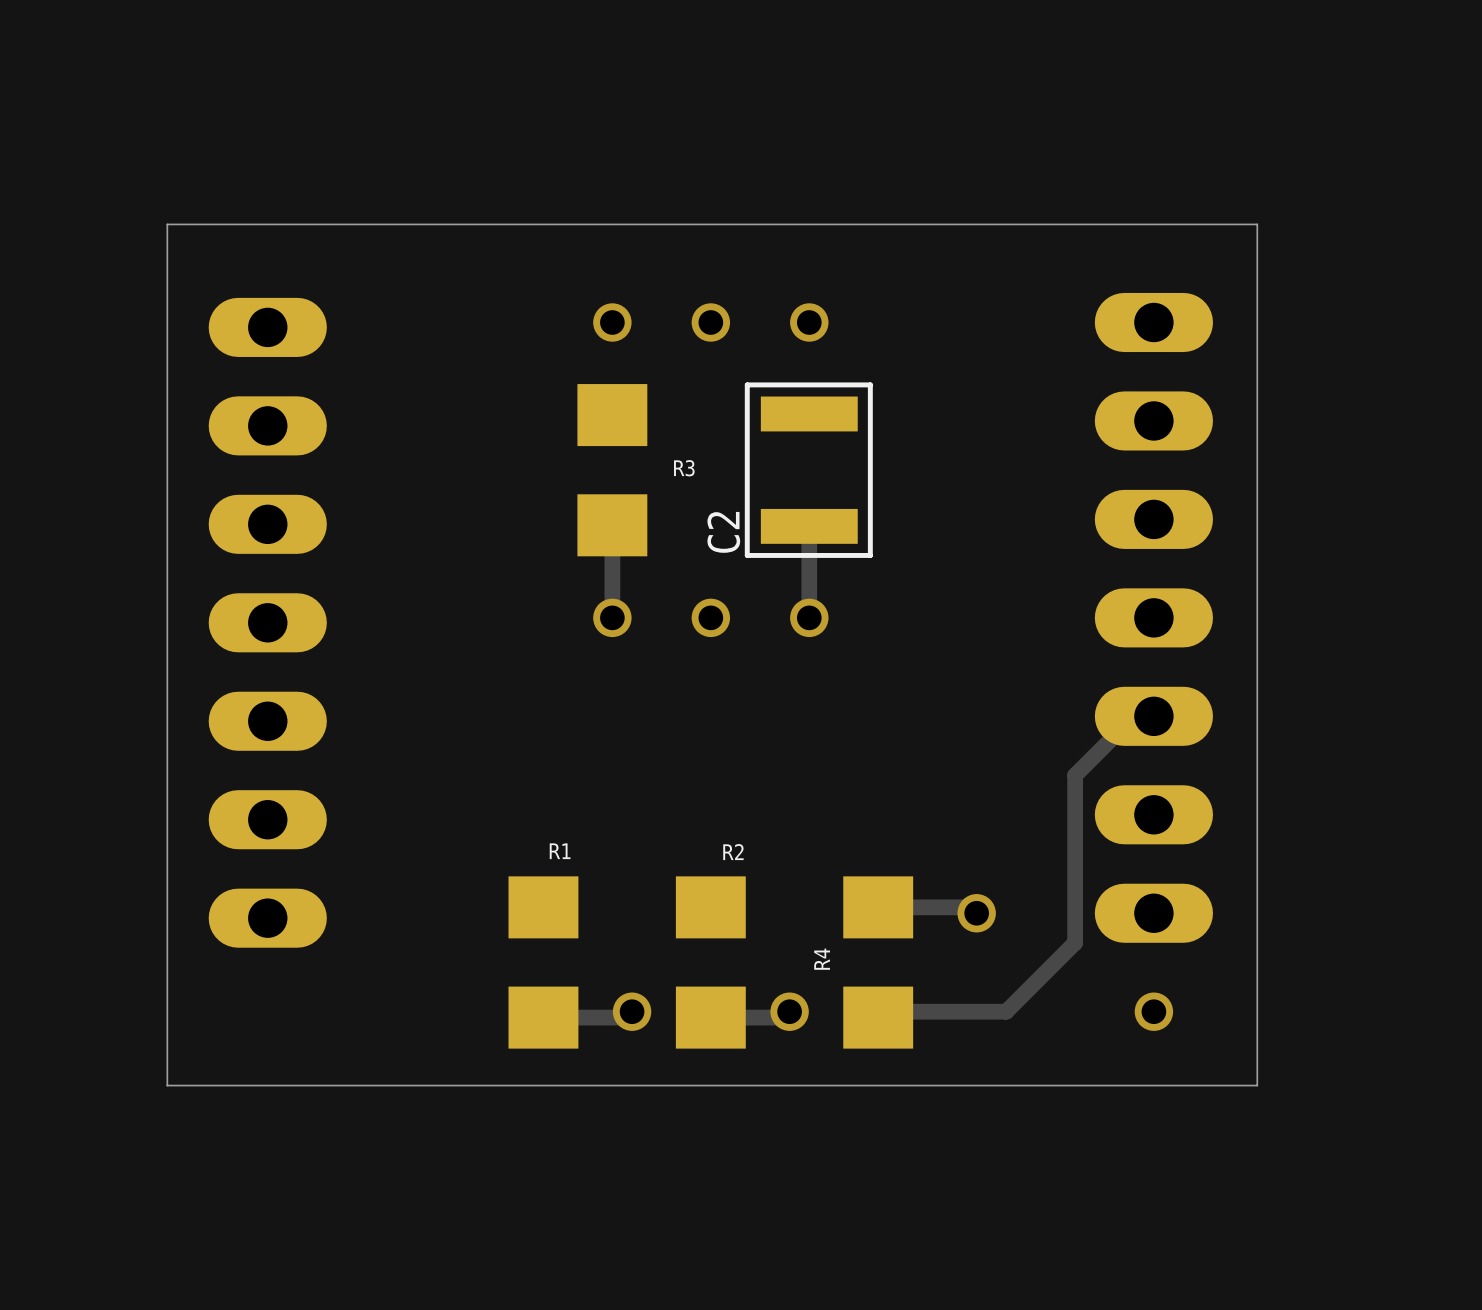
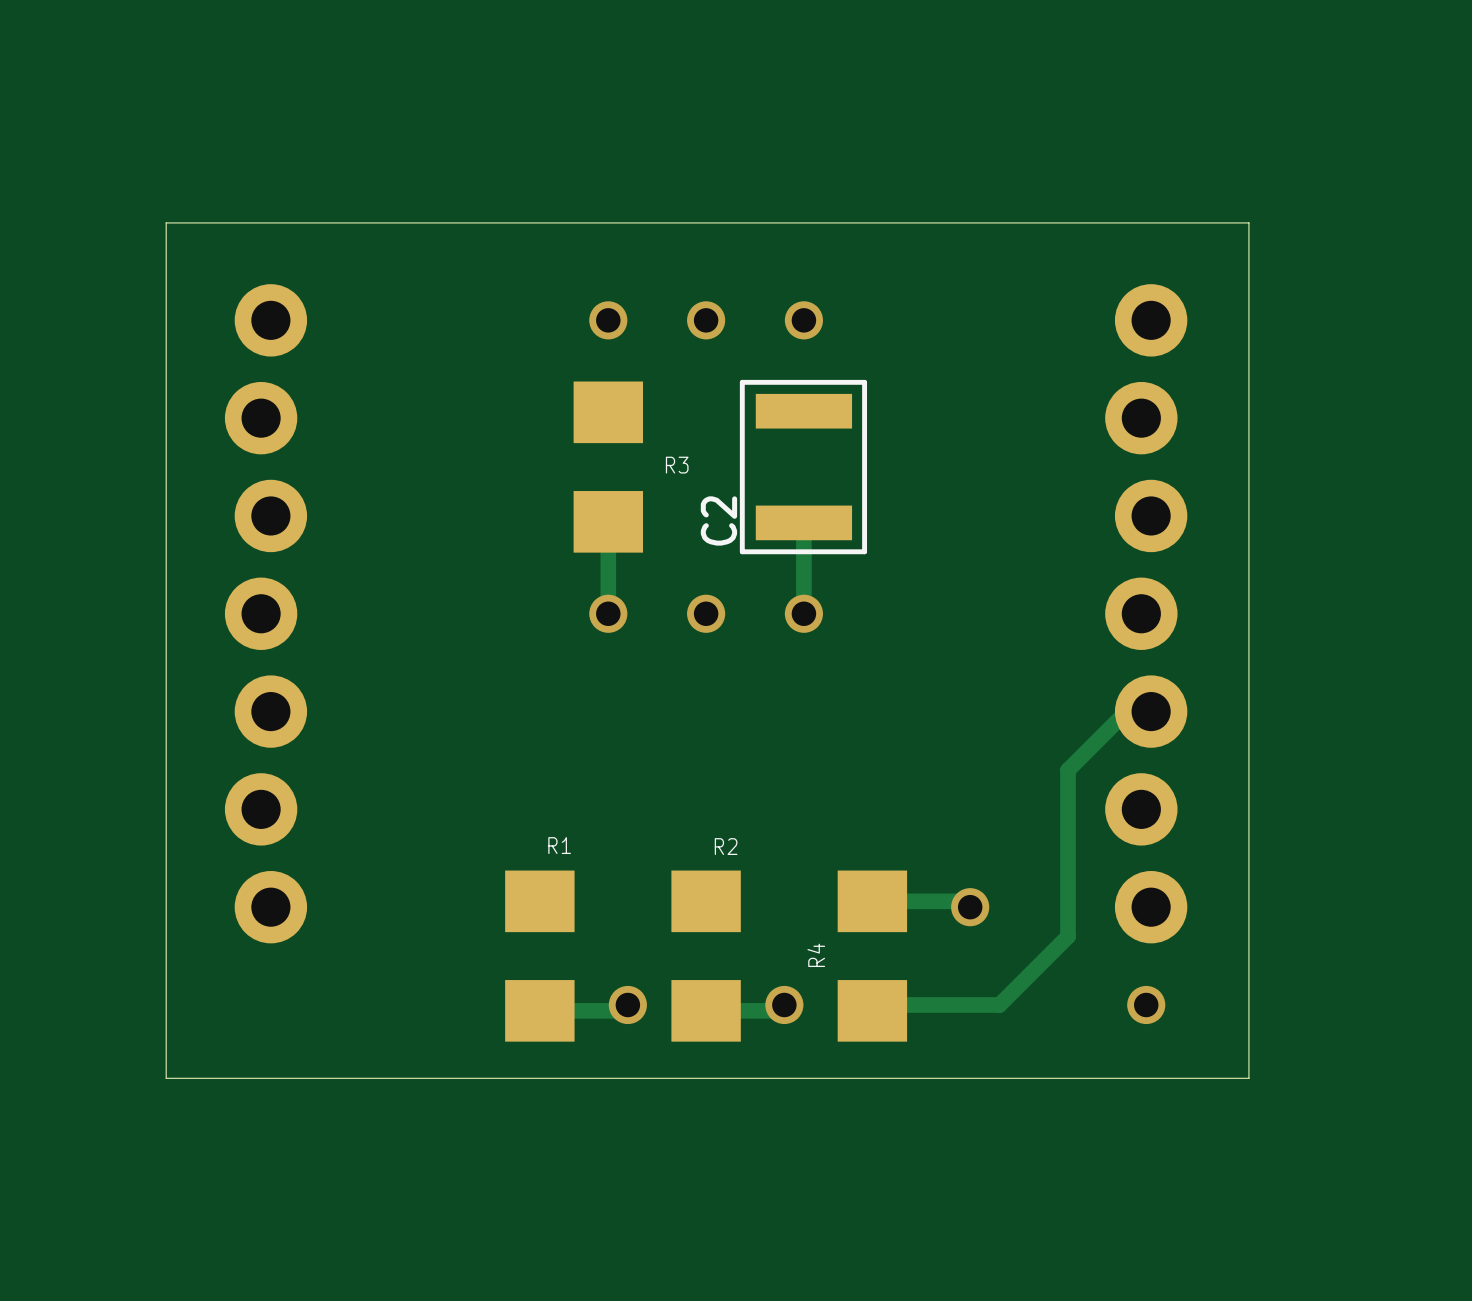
part footprint: [1094, 292, 1213, 943] -> [1105, 284, 1188, 944]
part footprint: [208, 297, 327, 948] -> [224, 284, 308, 944]

